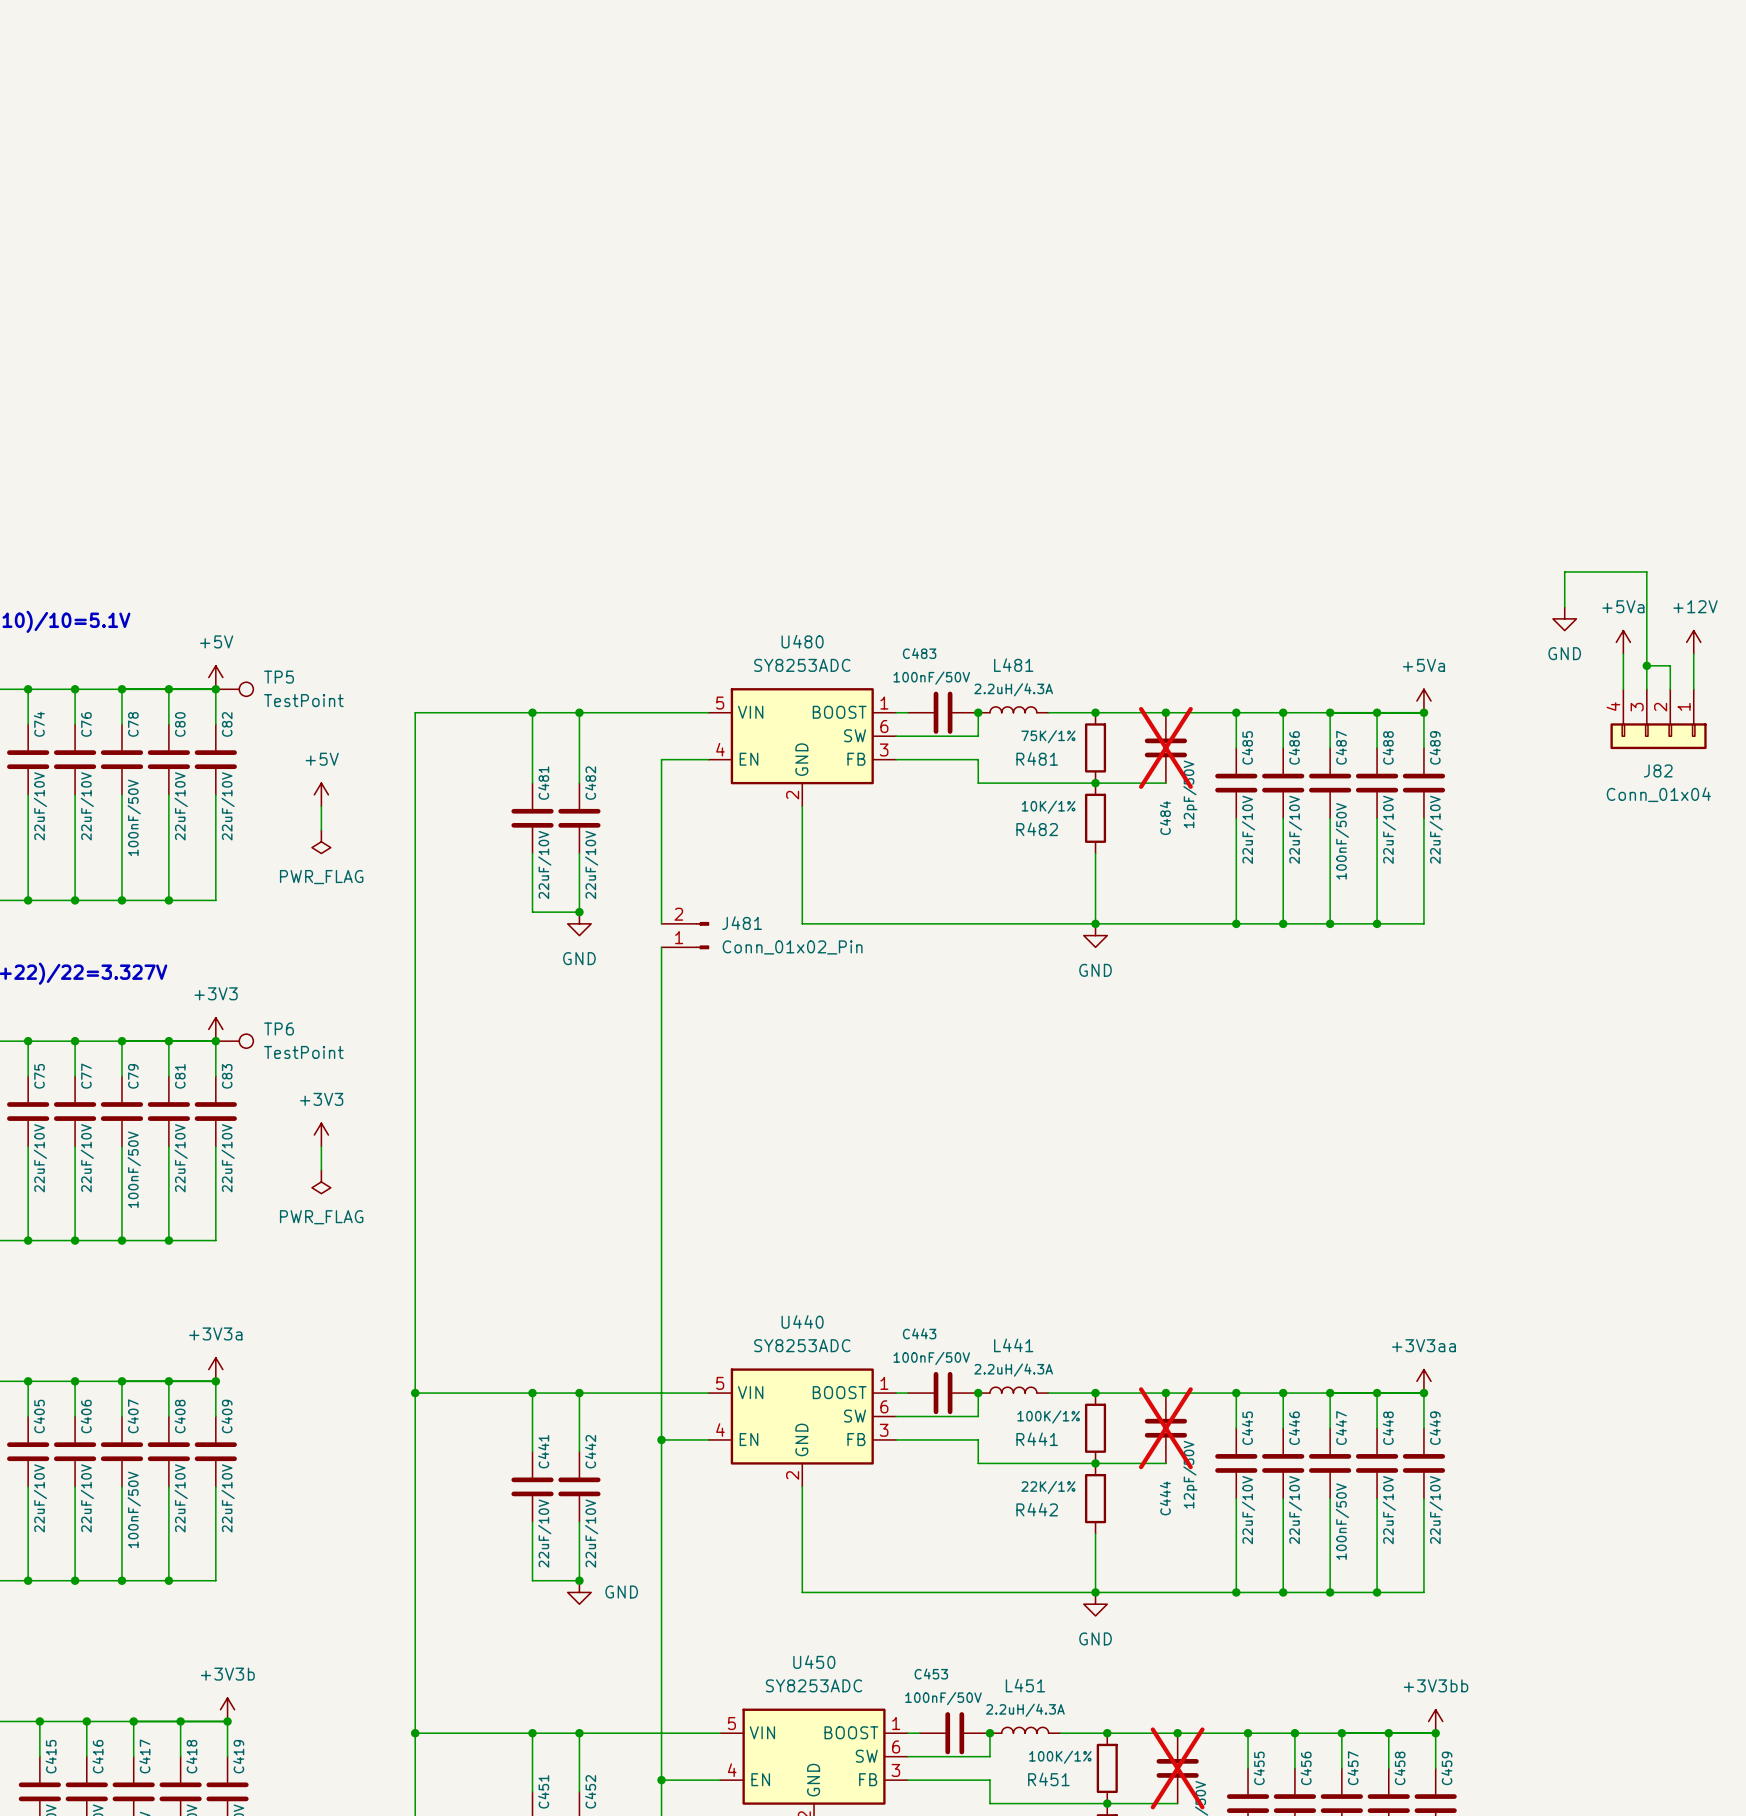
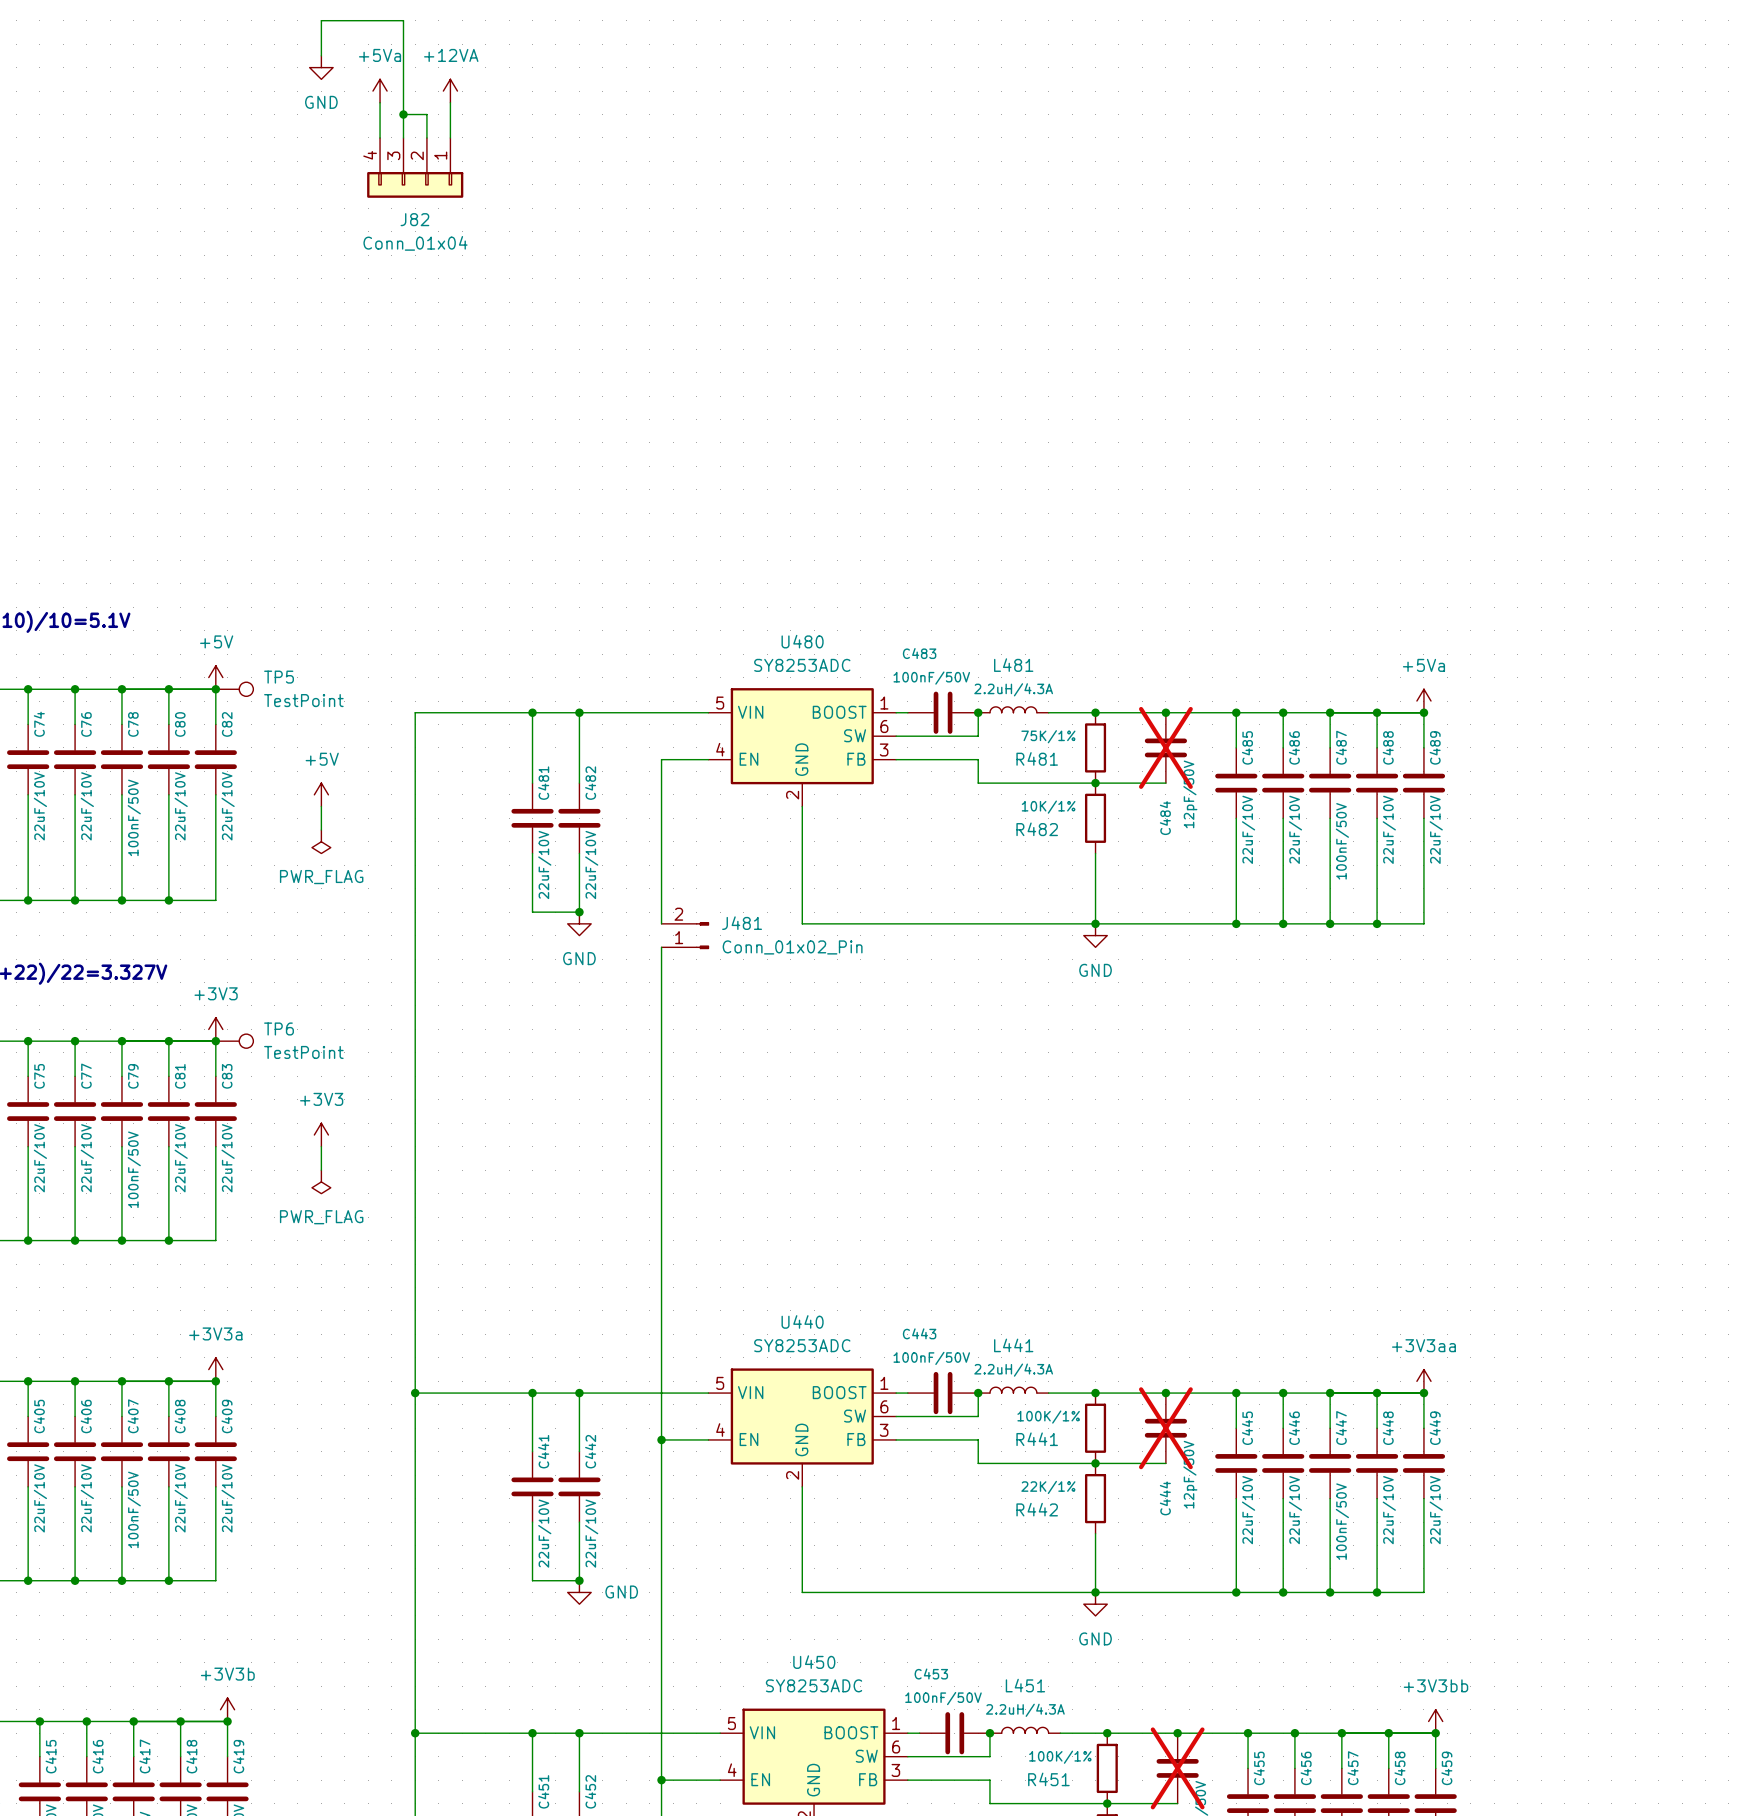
wire: none -> (321, 55) (321, 20) (403, 20) (403, 137)
power symbol: none -> GND (321, 67)
power symbol: none -> +5Va (380, 91)
power symbol: none -> +12VA (450, 91)
wire: none -> (380, 102) (380, 137)
wire: none -> (450, 102) (450, 137)
wire: none -> (403, 114) (426, 114) (426, 137)
junction: none -> (403, 114)
wire: (1564, 607) (1564, 571) (1646, 571) (1646, 689) -> none
power symbol: GND (1564, 618) -> none
power symbol: +5Va (1623, 642) -> none
power symbol: +12V (1693, 642) -> none
wire: (1623, 654) (1623, 689) -> none
wire: (1693, 654) (1693, 689) -> none
wire: (1646, 665) (1670, 665) (1670, 689) -> none
junction: (1646, 665) -> none
J82 position: (1658, 719) -> (415, 167)

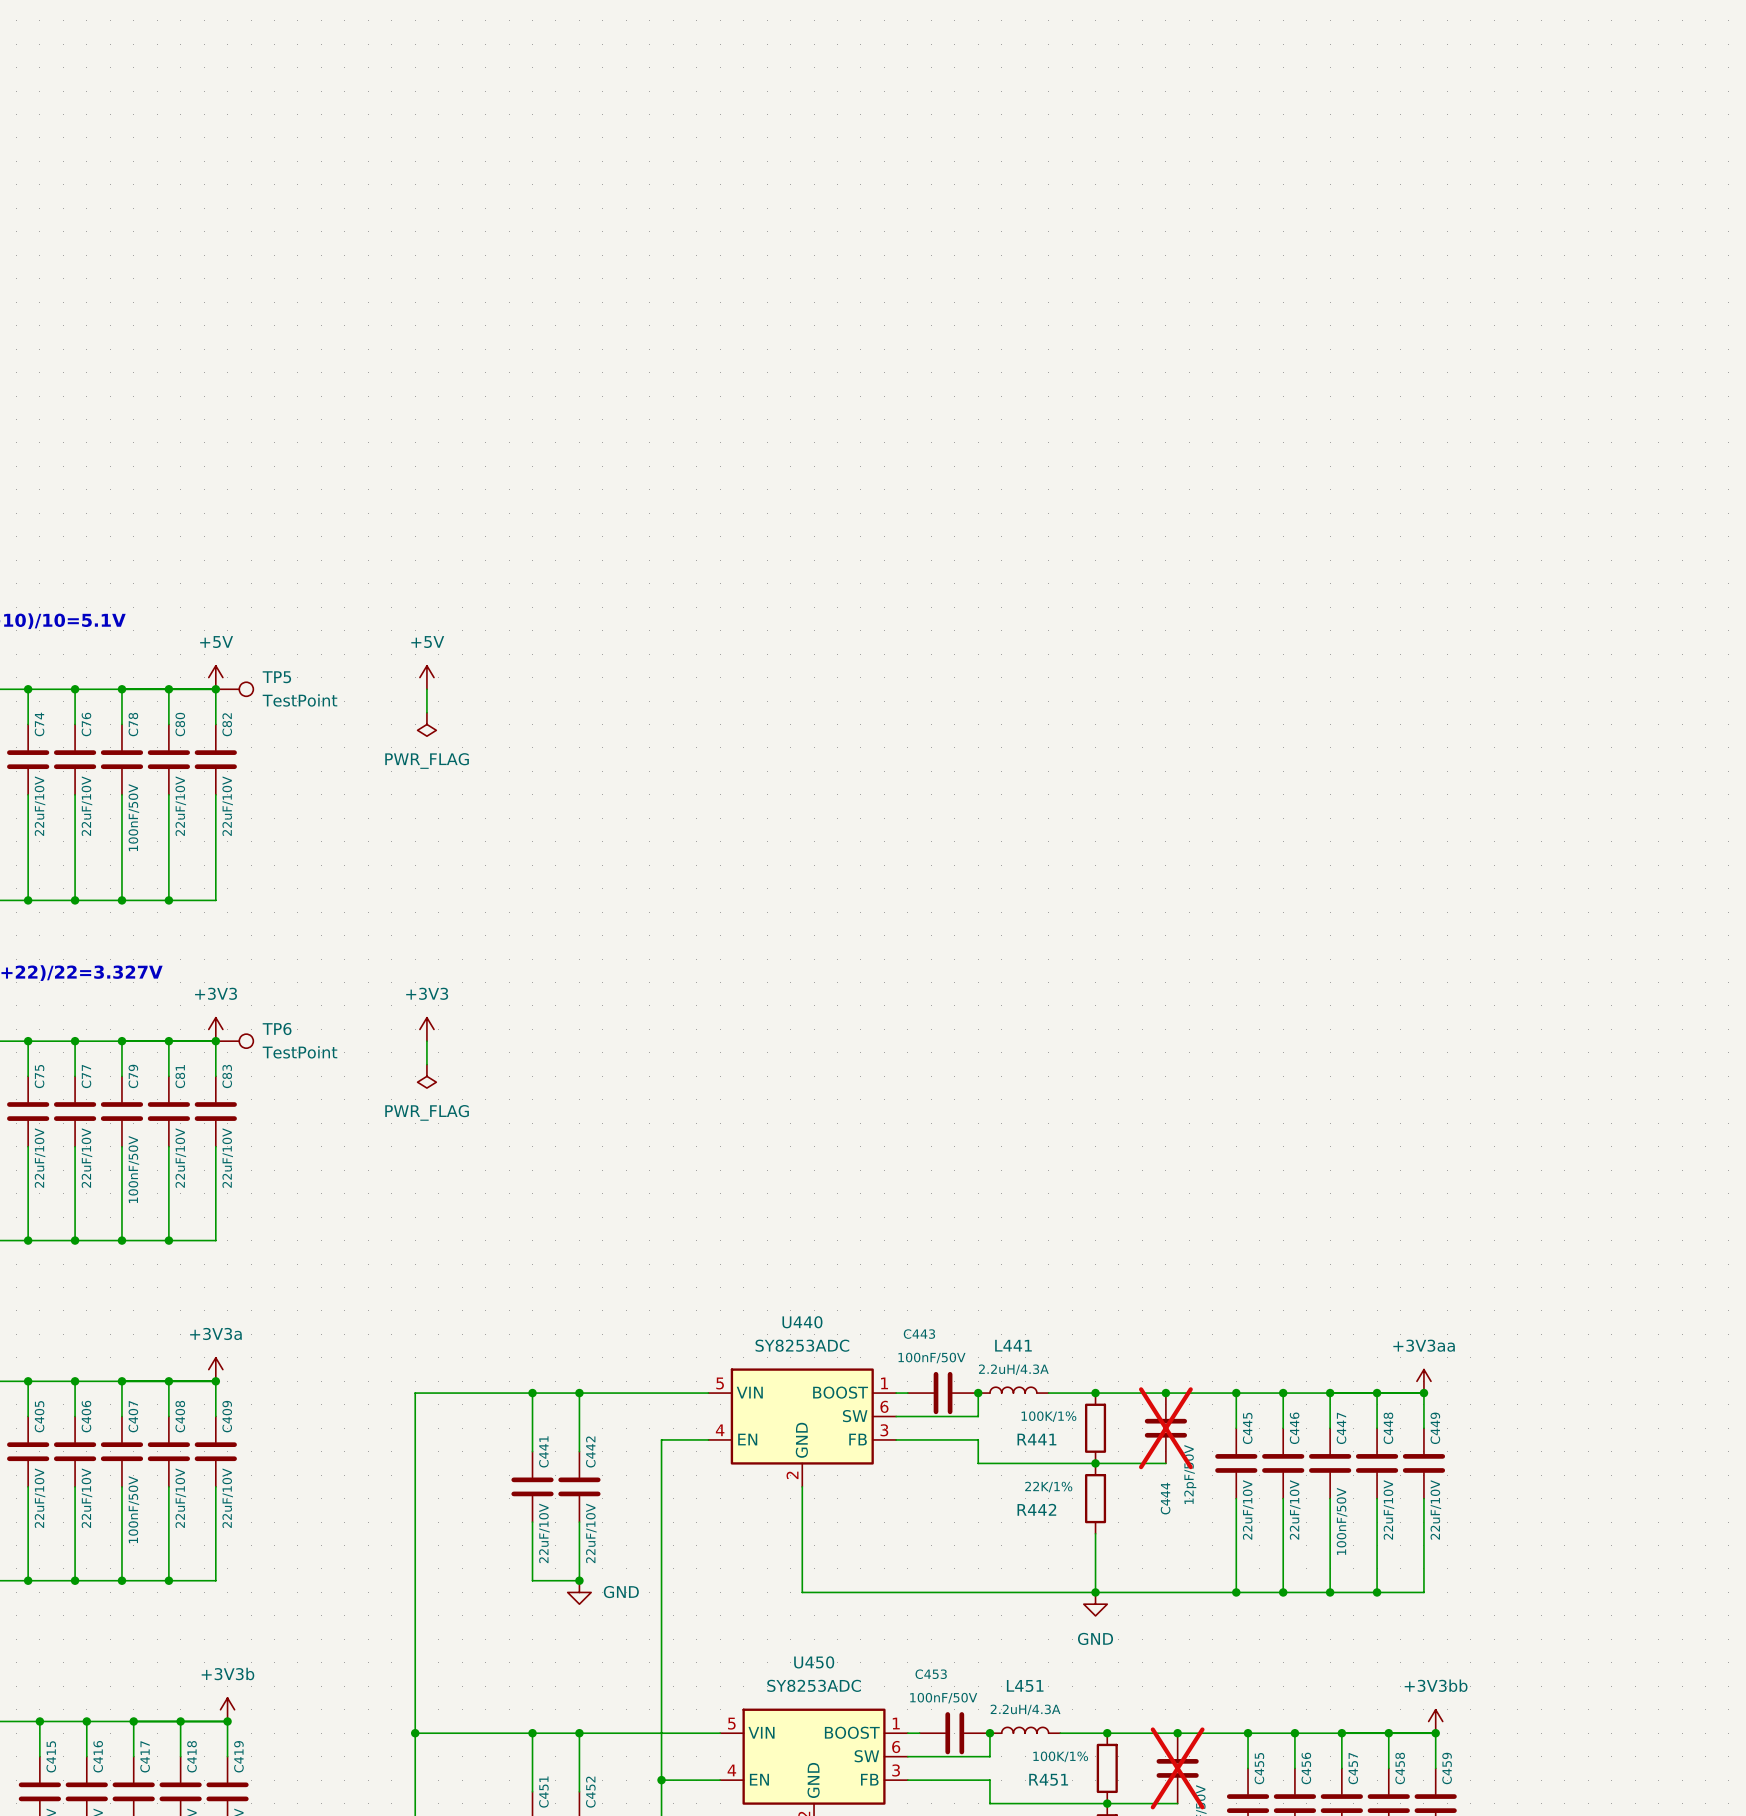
wire: (321, 55) (321, 20) (403, 20) (403, 137) -> none
power symbol: GND (321, 67) -> none
power symbol: +5Va (380, 91) -> none
power symbol: +12VA (450, 91) -> none
wire: (380, 102) (380, 137) -> none
wire: (450, 102) (450, 137) -> none
wire: (403, 114) (426, 114) (426, 137) -> none
junction: (403, 114) -> none
J82: Conn_01x04 (415, 167) -> none
power symbol: +5Va (1423, 701) -> none
L481: 2.2uH/4.3A (1013, 709) -> none
wire: (532, 712) (532, 783) -> none
junction: (532, 712) -> none
wire: (579, 712) (579, 783) -> none
junction: (579, 712) -> none
wire: (708, 712) (415, 712) (415, 1393) -> none
wire: (896, 712) (907, 712) -> none
C483: 100nF/50V (943, 712) -> none
wire: (978, 712) (978, 736) (896, 736) -> none
junction: (978, 712) -> none
wire: (1048, 712) (1423, 712) (1423, 747) -> none
junction: (1095, 712) -> none
junction: (1165, 712) -> none
wire: (1236, 712) (1236, 747) -> none
junction: (1236, 712) -> none
wire: (1283, 712) (1283, 747) -> none
junction: (1283, 712) -> none
wire: (1330, 712) (1330, 747) -> none
junction: (1330, 712) -> none
wire: (1377, 712) (1377, 747) -> none
junction: (1377, 712) -> none
junction: (1423, 712) -> none
power symbol: none -> PWR_FLAG (426, 724)
U480: SY8253ADC (802, 747) -> none
R481: 75K/1% (1095, 747) -> none
C484: 12pF/50V (1165, 747) -> none
wire: (708, 759) (661, 759) (661, 923) -> none
wire: (896, 759) (978, 759) (978, 783) (1165, 783) -> none
junction: (1095, 783) -> none
C485: 22uF/10V (1236, 783) -> none
C486: 22uF/10V (1283, 783) -> none
C487: 100nF/50V (1330, 783) -> none
C488: 22uF/10V (1377, 783) -> none
C489: 22uF/10V (1423, 783) -> none
power symbol position: +5V (321, 794) -> +5V (426, 677)
wire: (321, 806) (321, 830) -> (426, 689) (426, 712)
wire: (802, 806) (802, 923) (1423, 923) (1423, 818) -> none
C481: 22uF/10V (532, 818) -> none
C482: 22uF/10V (579, 818) -> none
R482: 10K/1% (1095, 818) -> none
wire: (1236, 818) (1236, 923) -> none
wire: (1283, 818) (1283, 923) -> none
wire: (1330, 818) (1330, 923) -> none
wire: (1377, 818) (1377, 923) -> none
power symbol: PWR_FLAG (321, 841) -> none
wire: (532, 853) (532, 912) (579, 912) (579, 853) -> none
wire: (1095, 853) (1095, 923) -> none
junction: (579, 912) -> none
power symbol: GND (579, 923) -> none
junction: (1095, 923) -> none
junction: (1236, 923) -> none
junction: (1283, 923) -> none
junction: (1330, 923) -> none
junction: (1377, 923) -> none
J481: Conn_01x02_Pin (685, 935) -> none
power symbol: GND (1095, 935) -> none
wire: (661, 947) (661, 1439) -> none
power symbol: none -> PWR_FLAG (426, 1076)
power symbol position: +3V3 (321, 1135) -> +3V3 (426, 1029)
wire: (321, 1146) (321, 1170) -> (426, 1041) (426, 1064)
power symbol: PWR_FLAG (321, 1181) -> none
junction: (415, 1393) -> none
junction: (661, 1439) -> none

